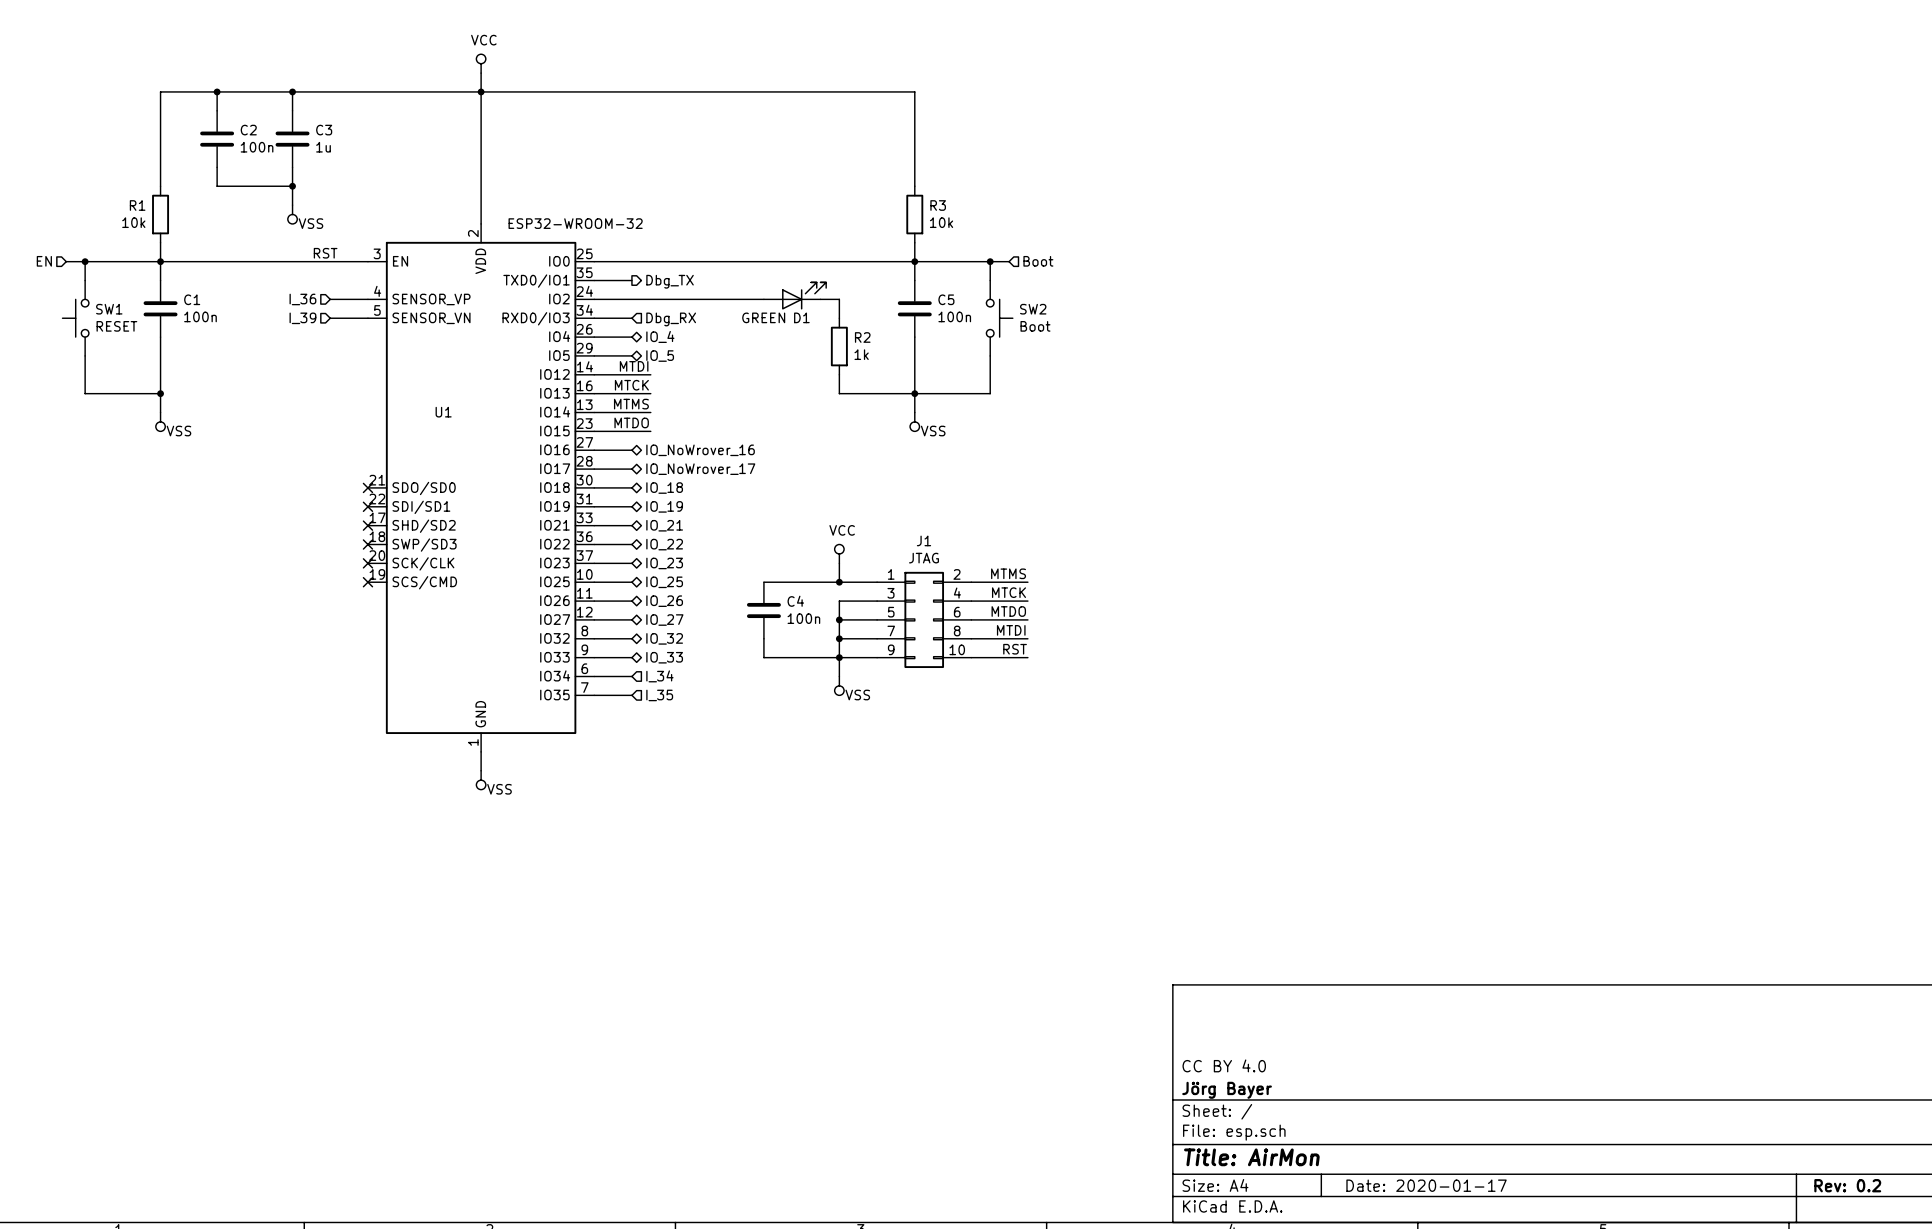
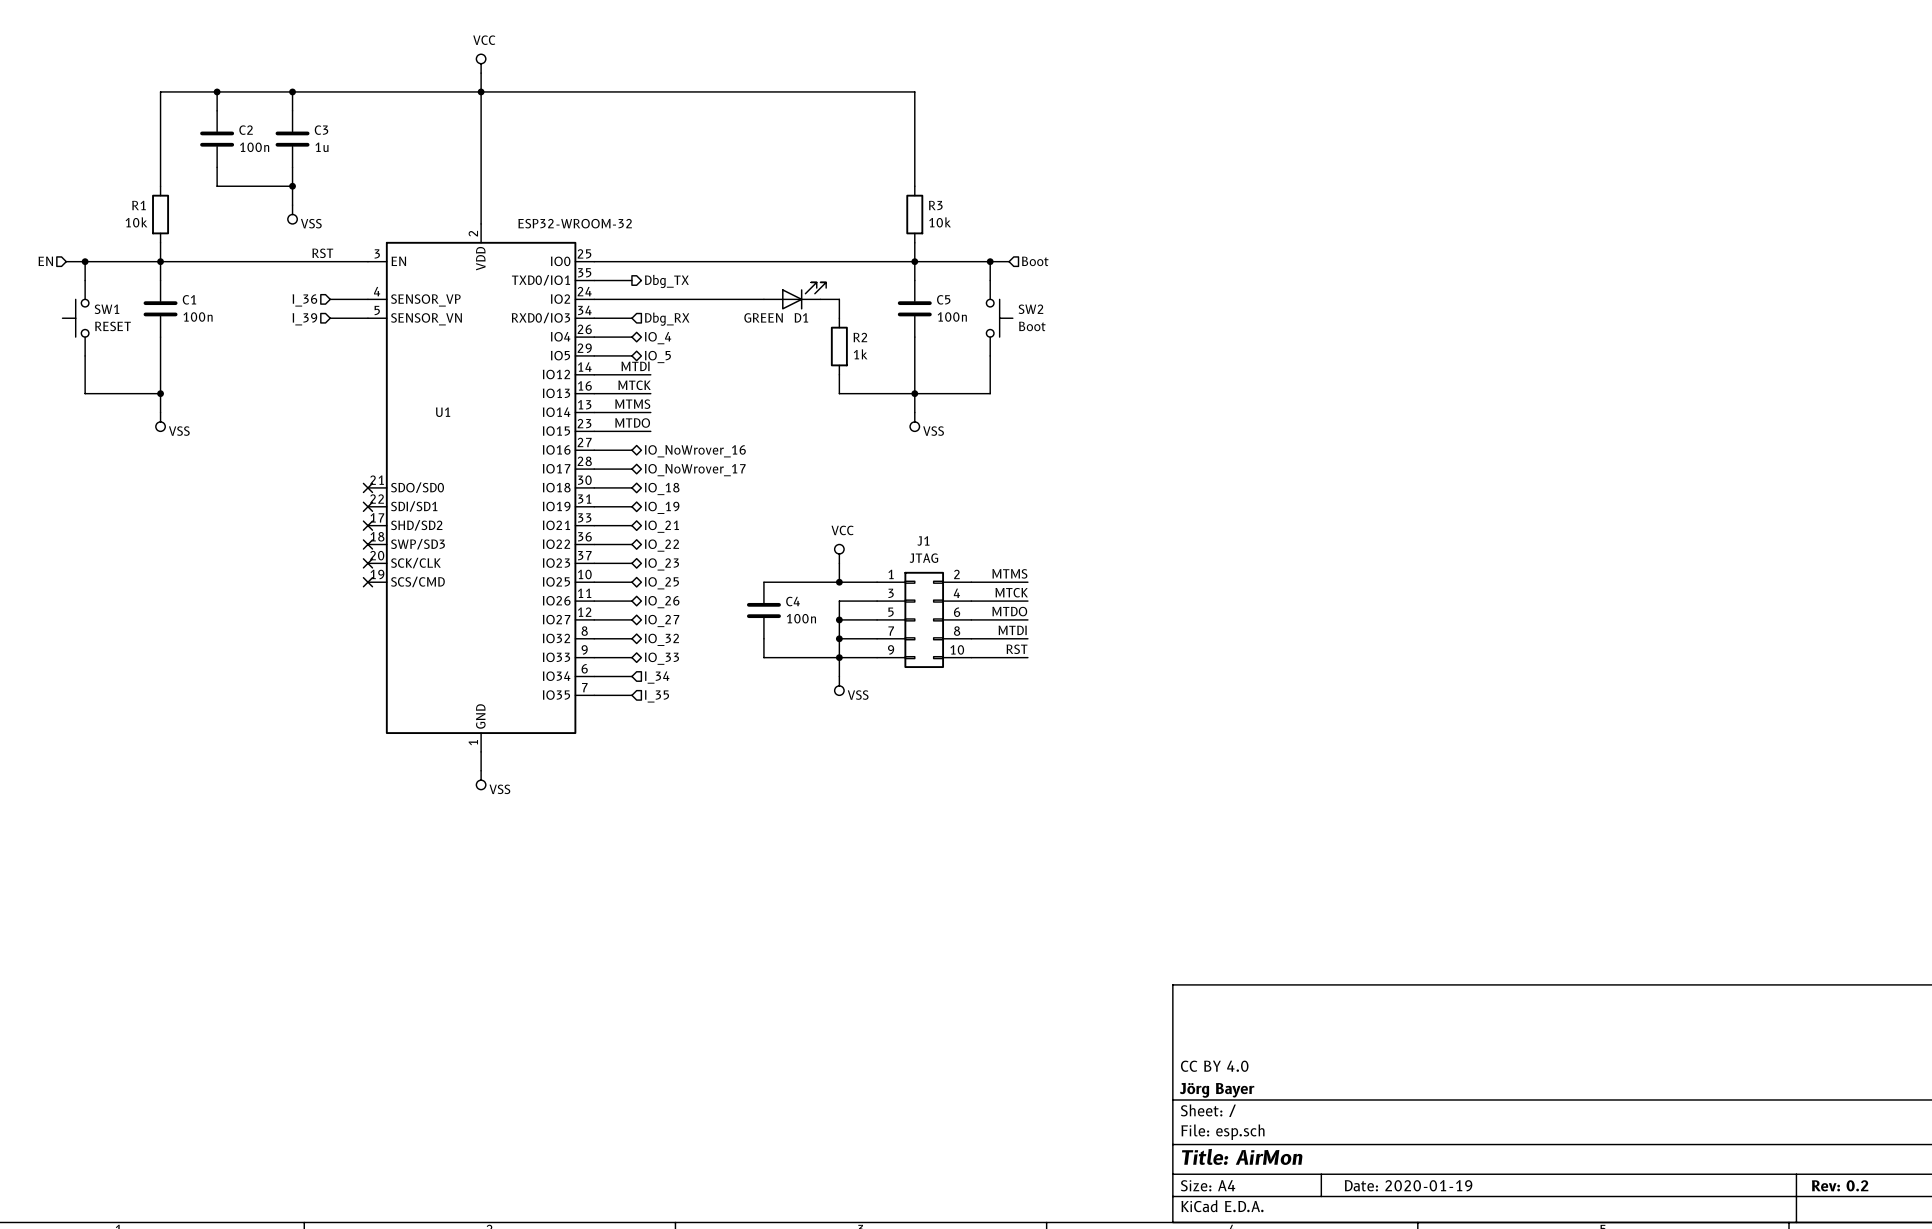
title block: Date: 2020-01-17 (1426, 1185) -> Date: 2020-01-19 (1408, 1185)

